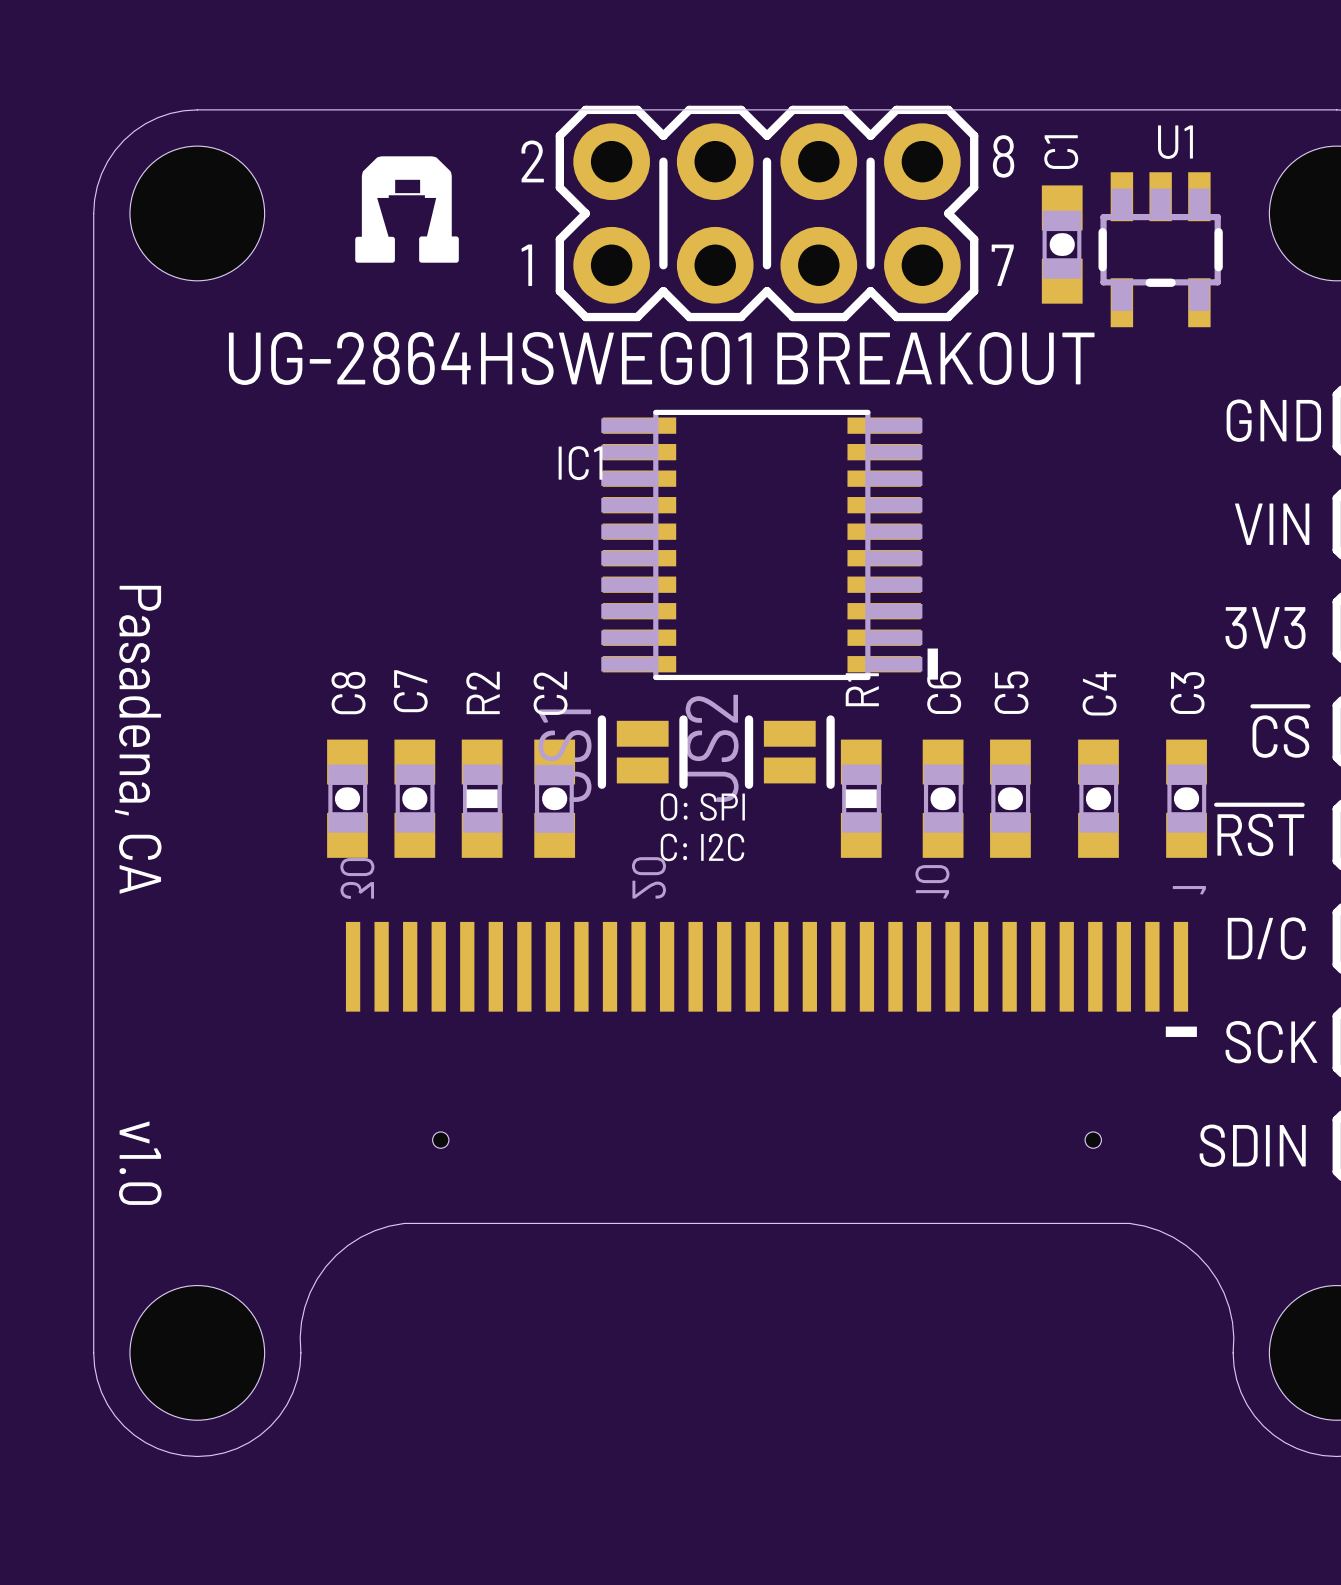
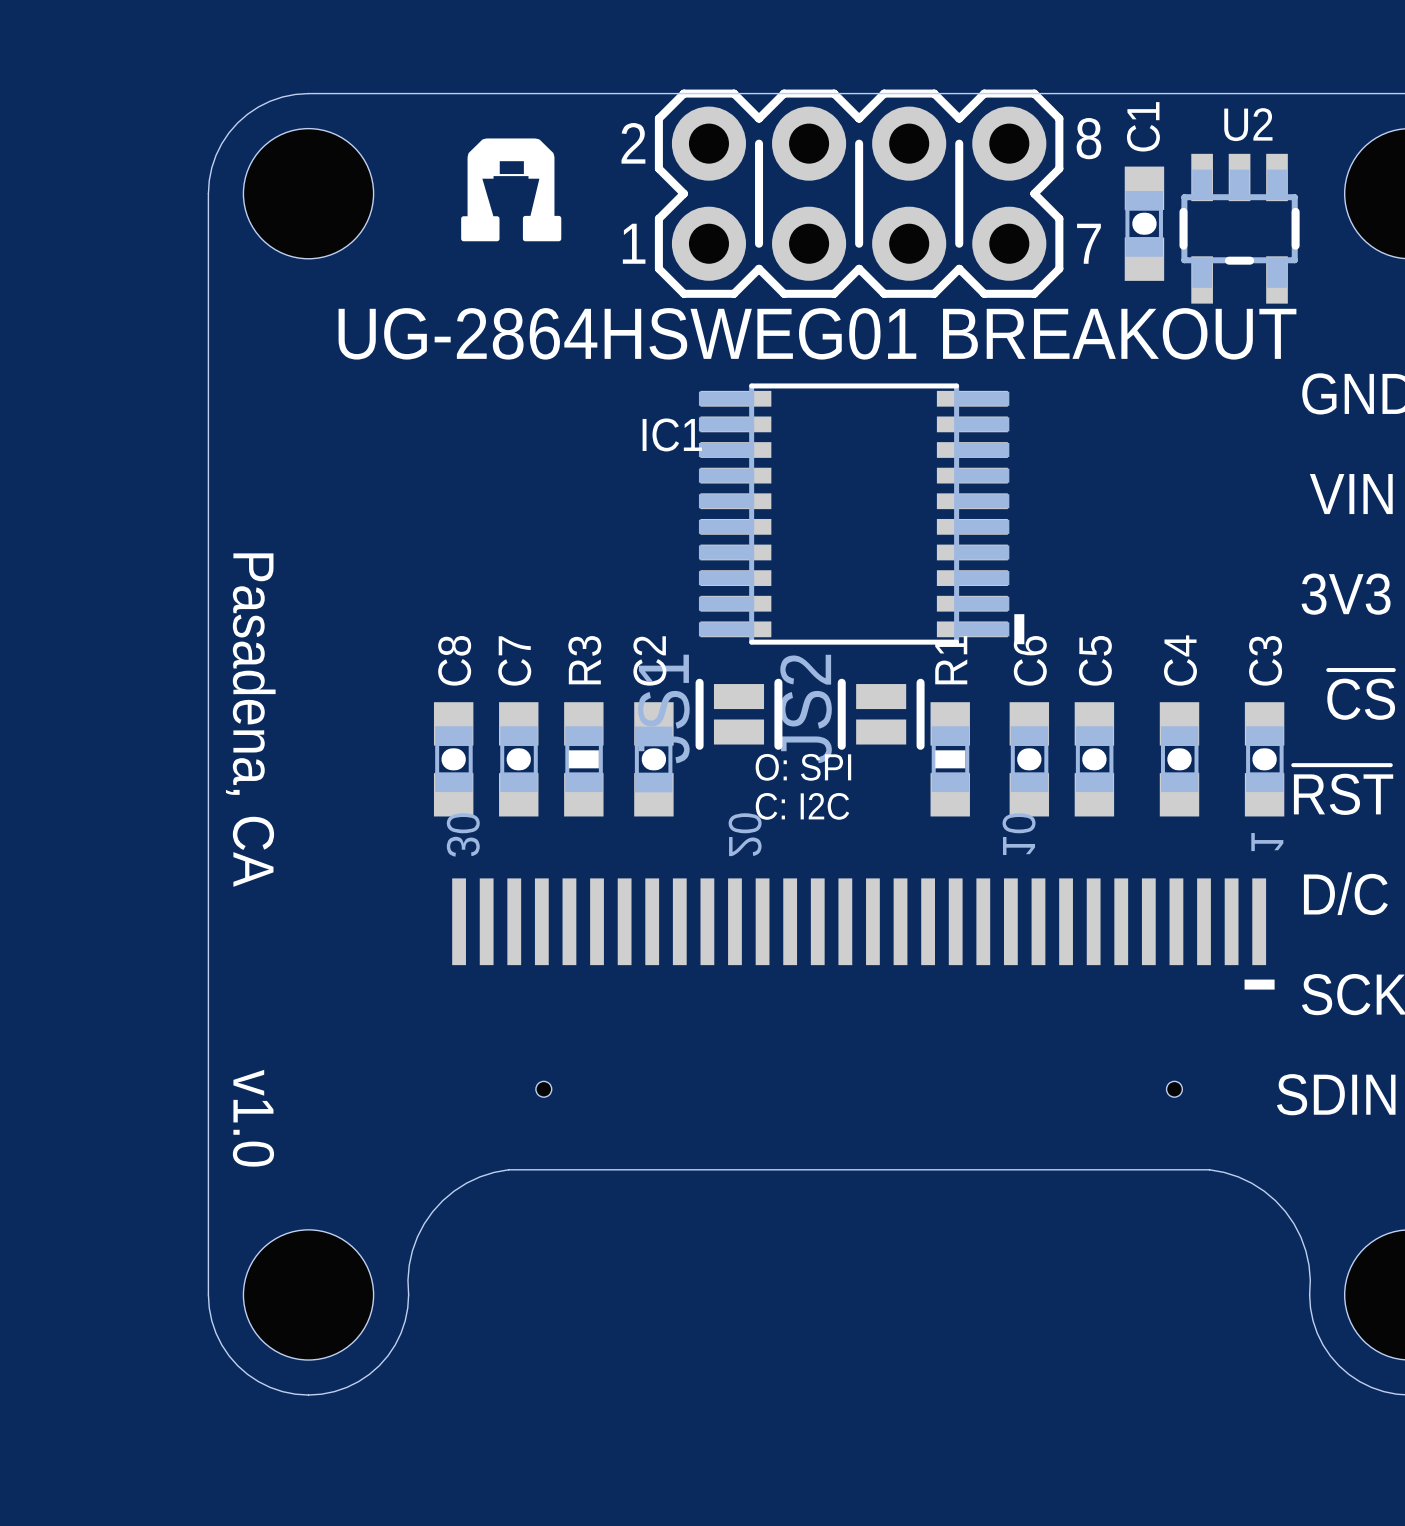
U1 name: U1 (1175, 142) -> U2 (1248, 124)
R2 name: R2 (483, 692) -> R3 (584, 660)

